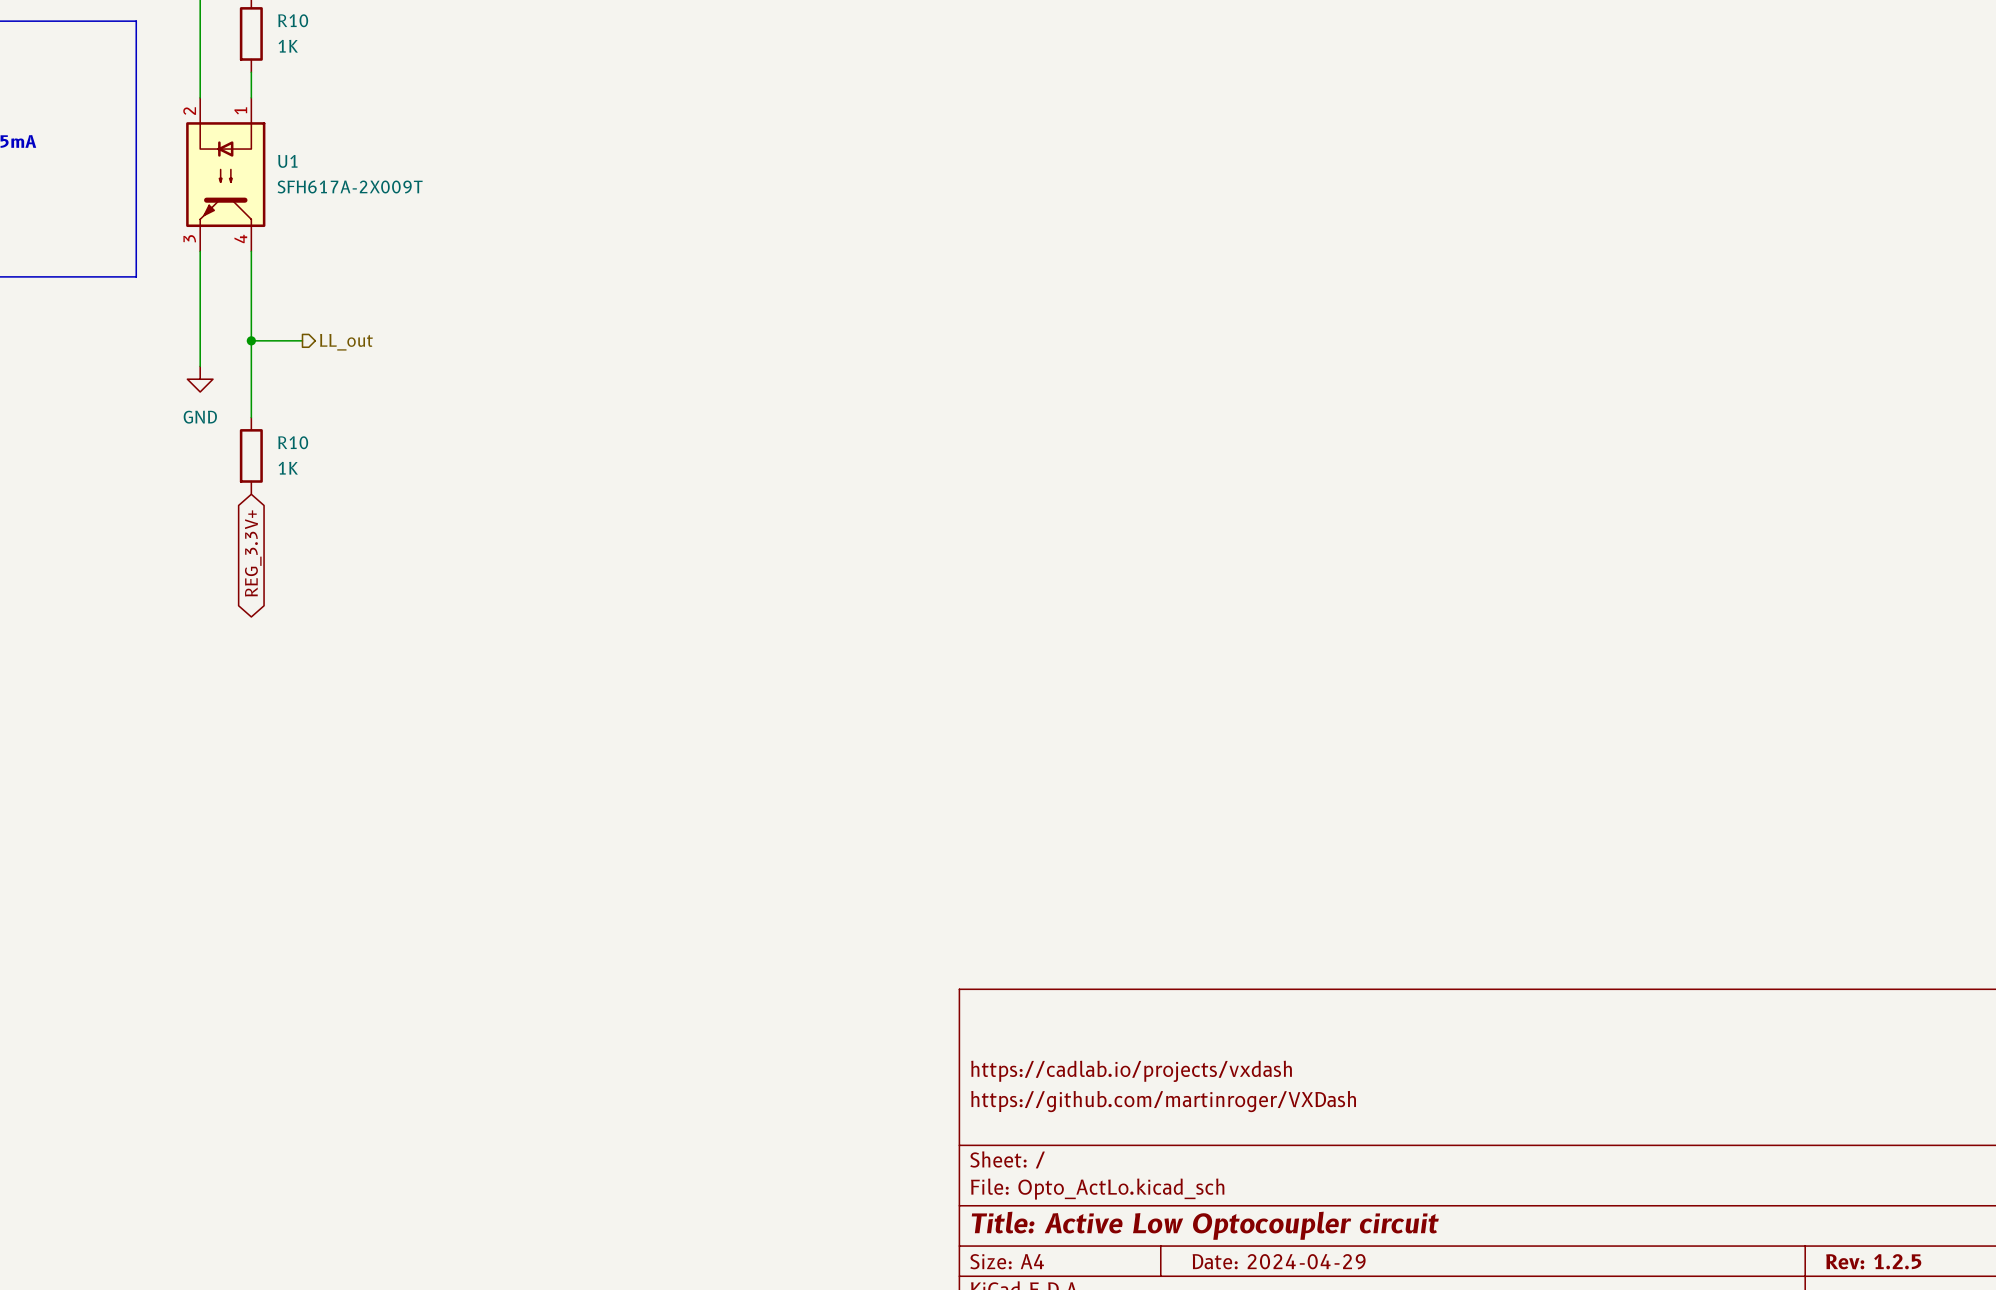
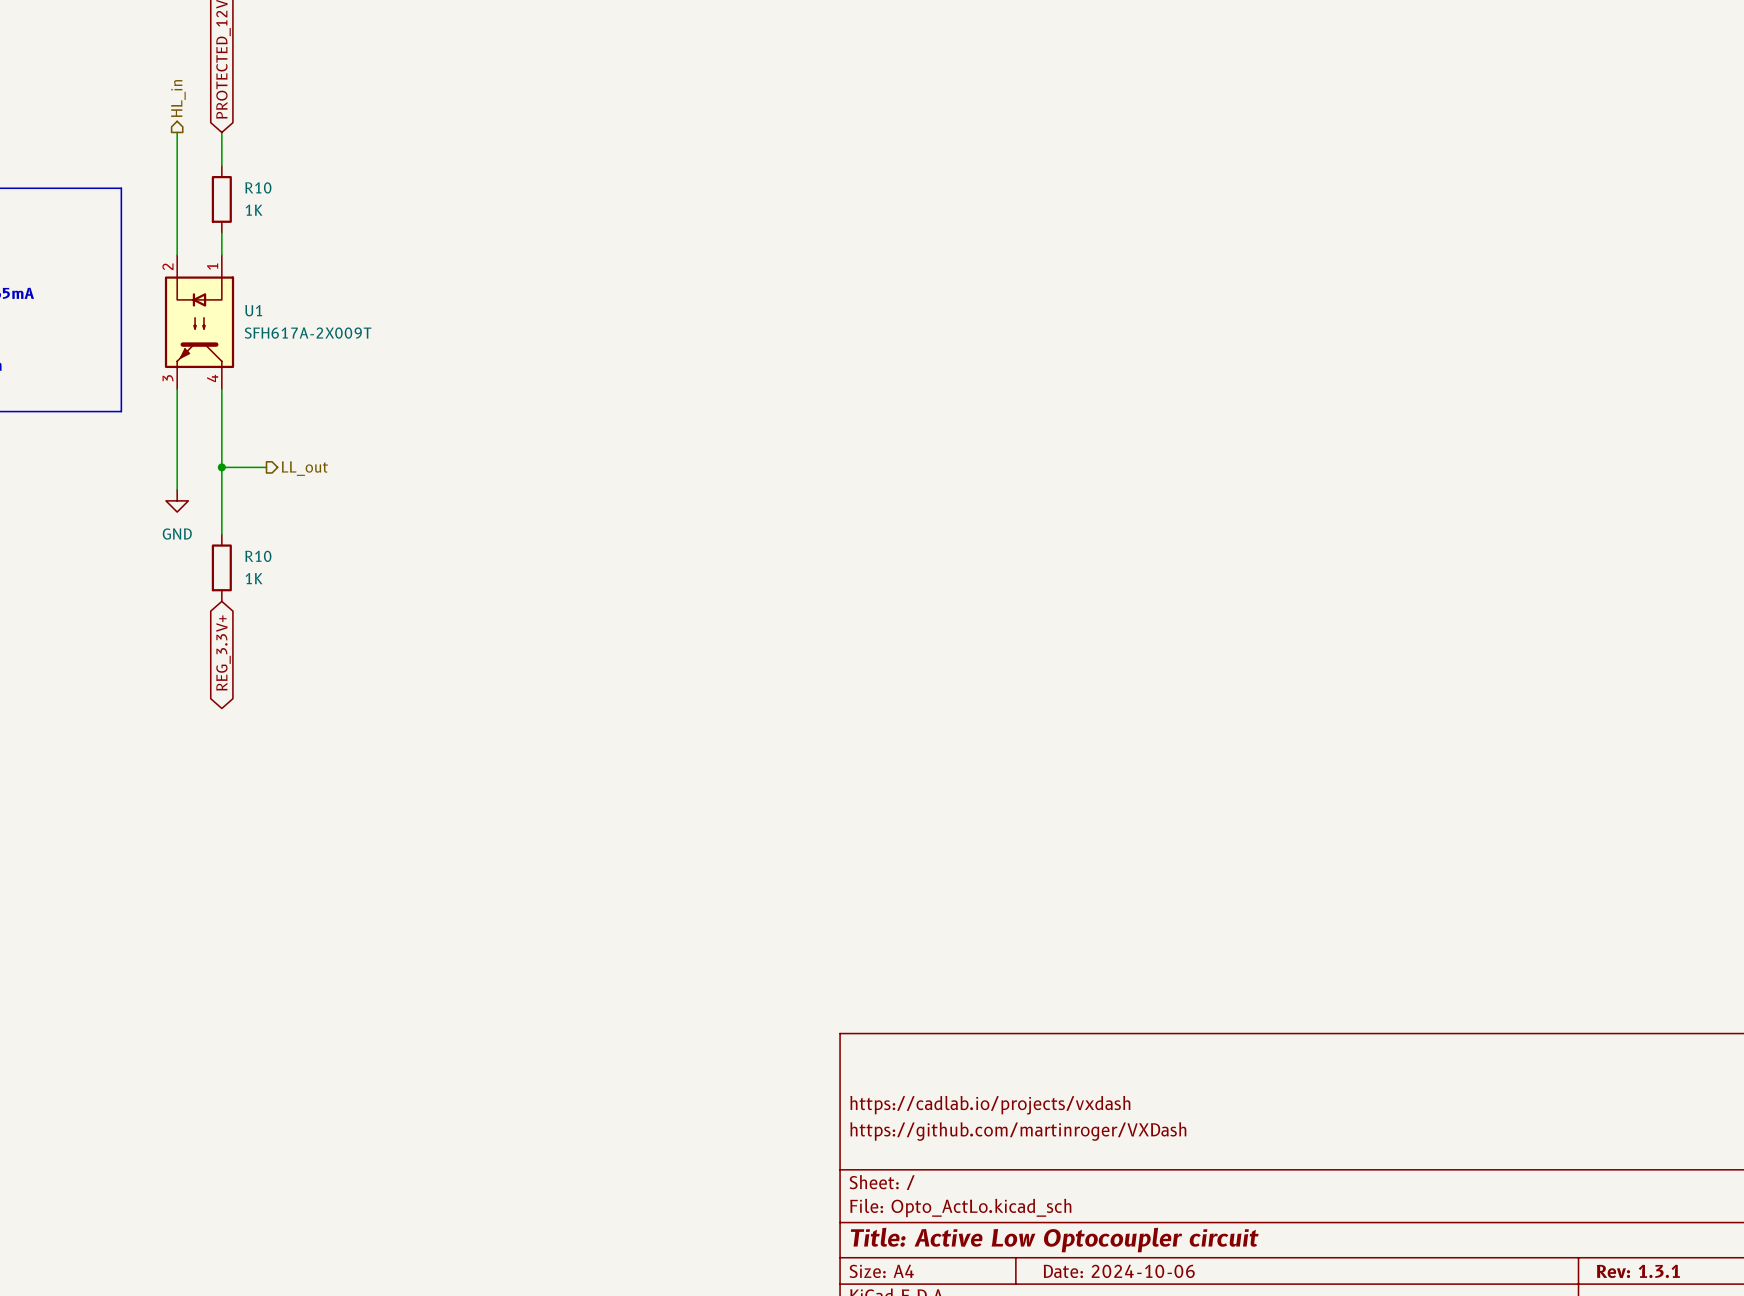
title block: Date: 2024-04-29 (1279, 1261) -> Date: 2024-10-06 (1119, 1271)
title block: Rev: 1.2.5 (1873, 1261) -> Rev: 1.3.1 (1638, 1271)

